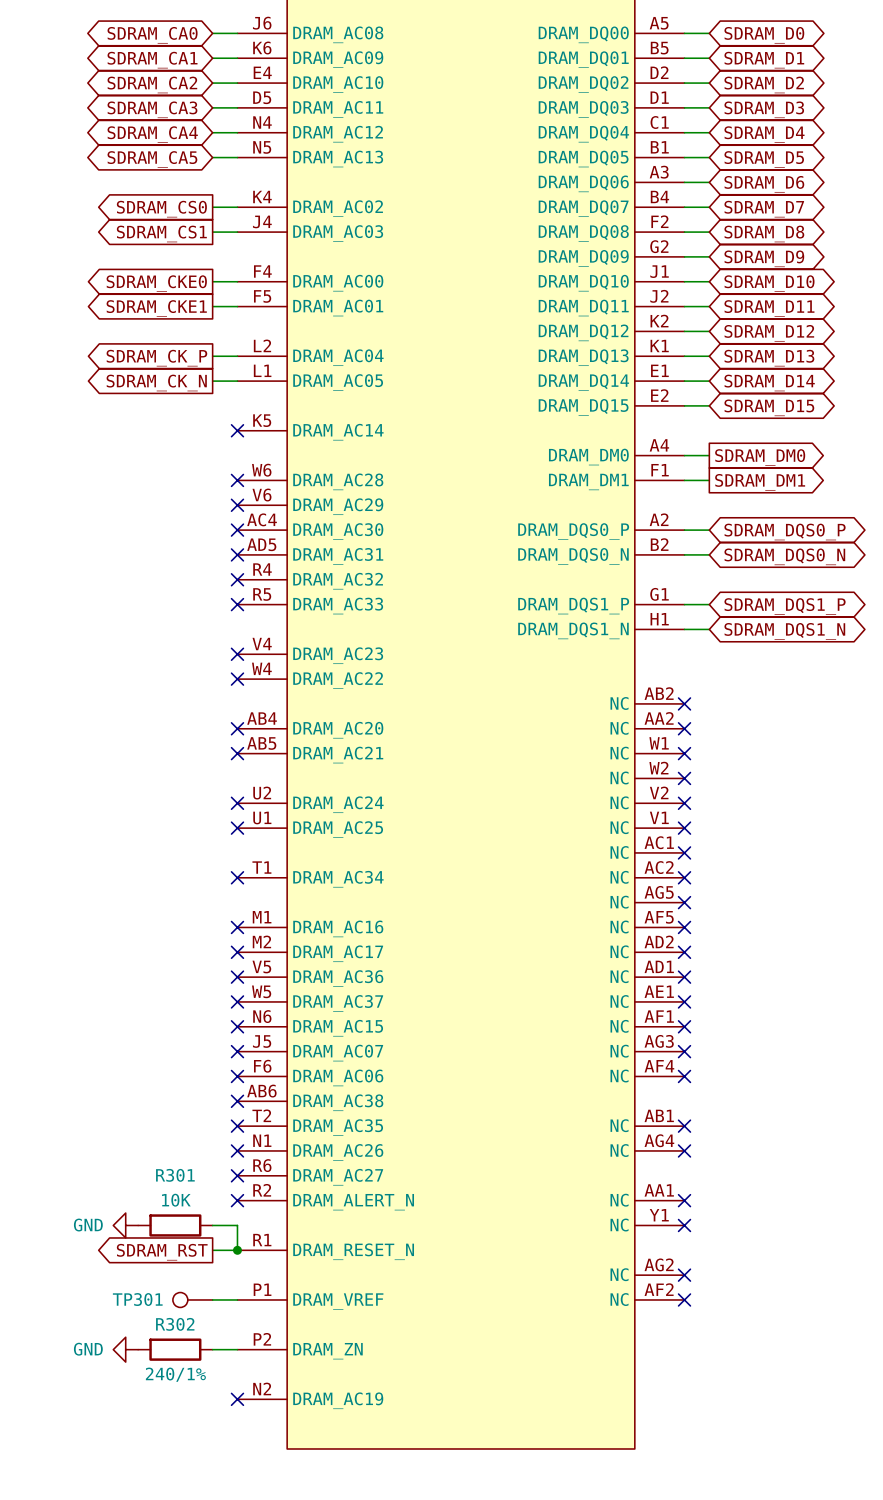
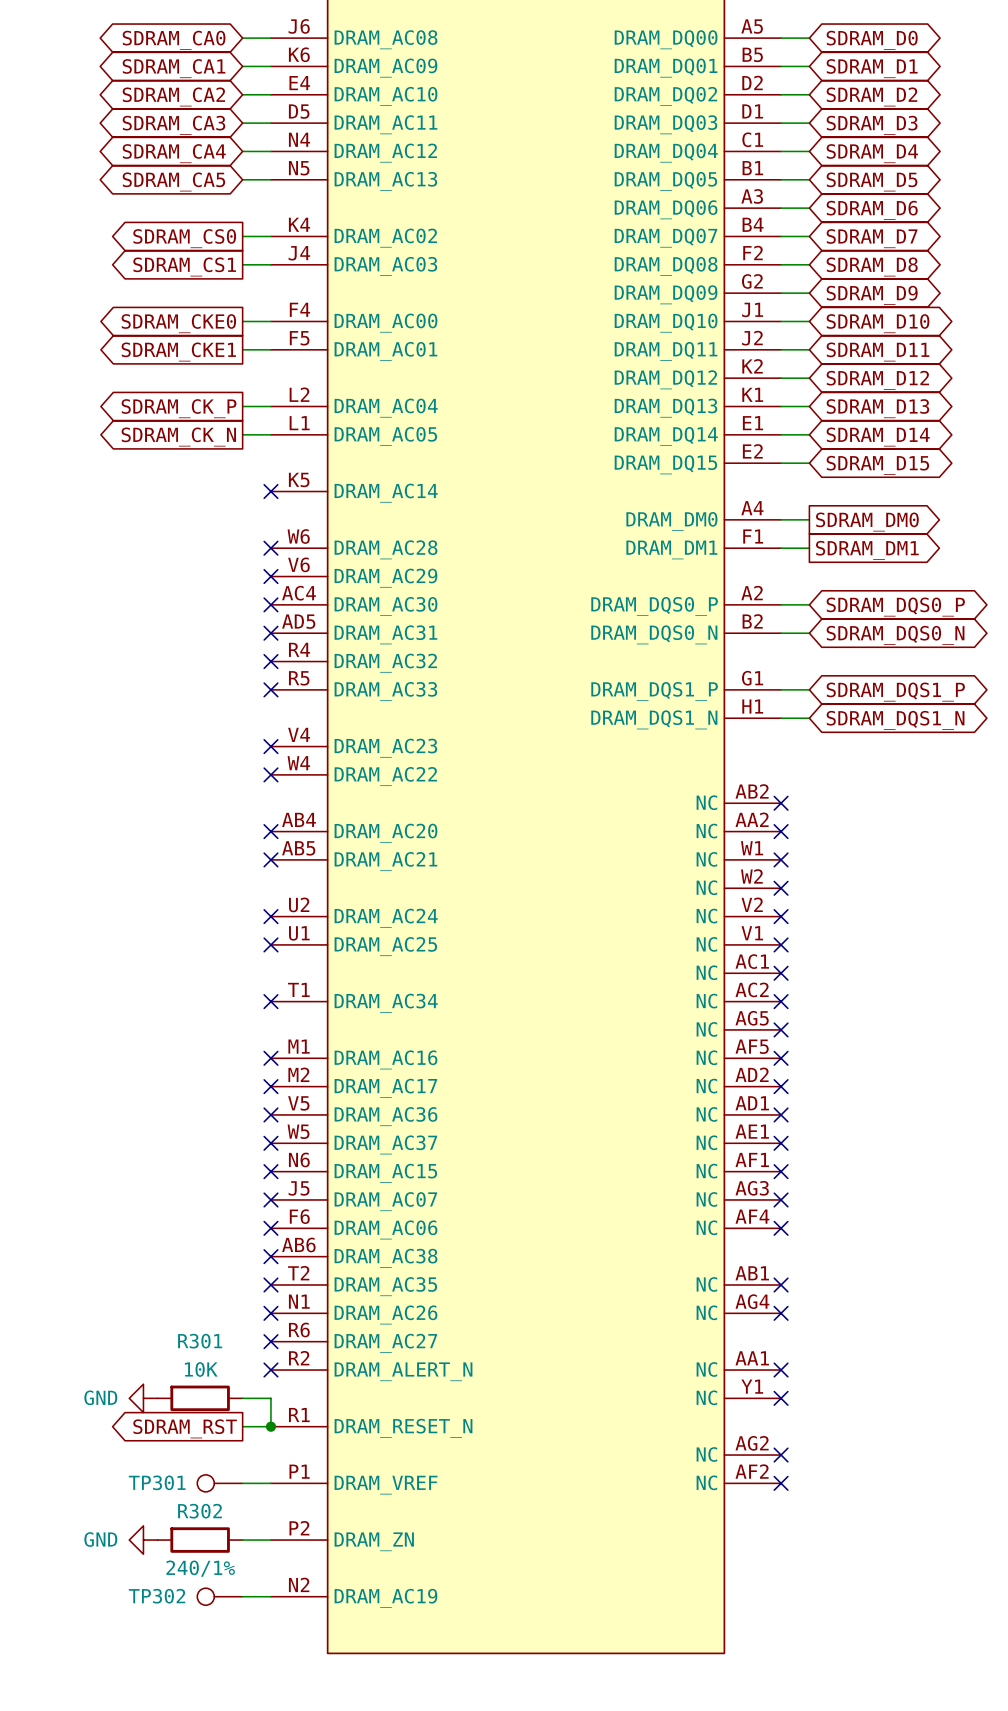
TP302: none -> (219, 1596)
wire: none -> (242, 1596) (270, 1596)
no-connect mark: (237, 1399) -> none

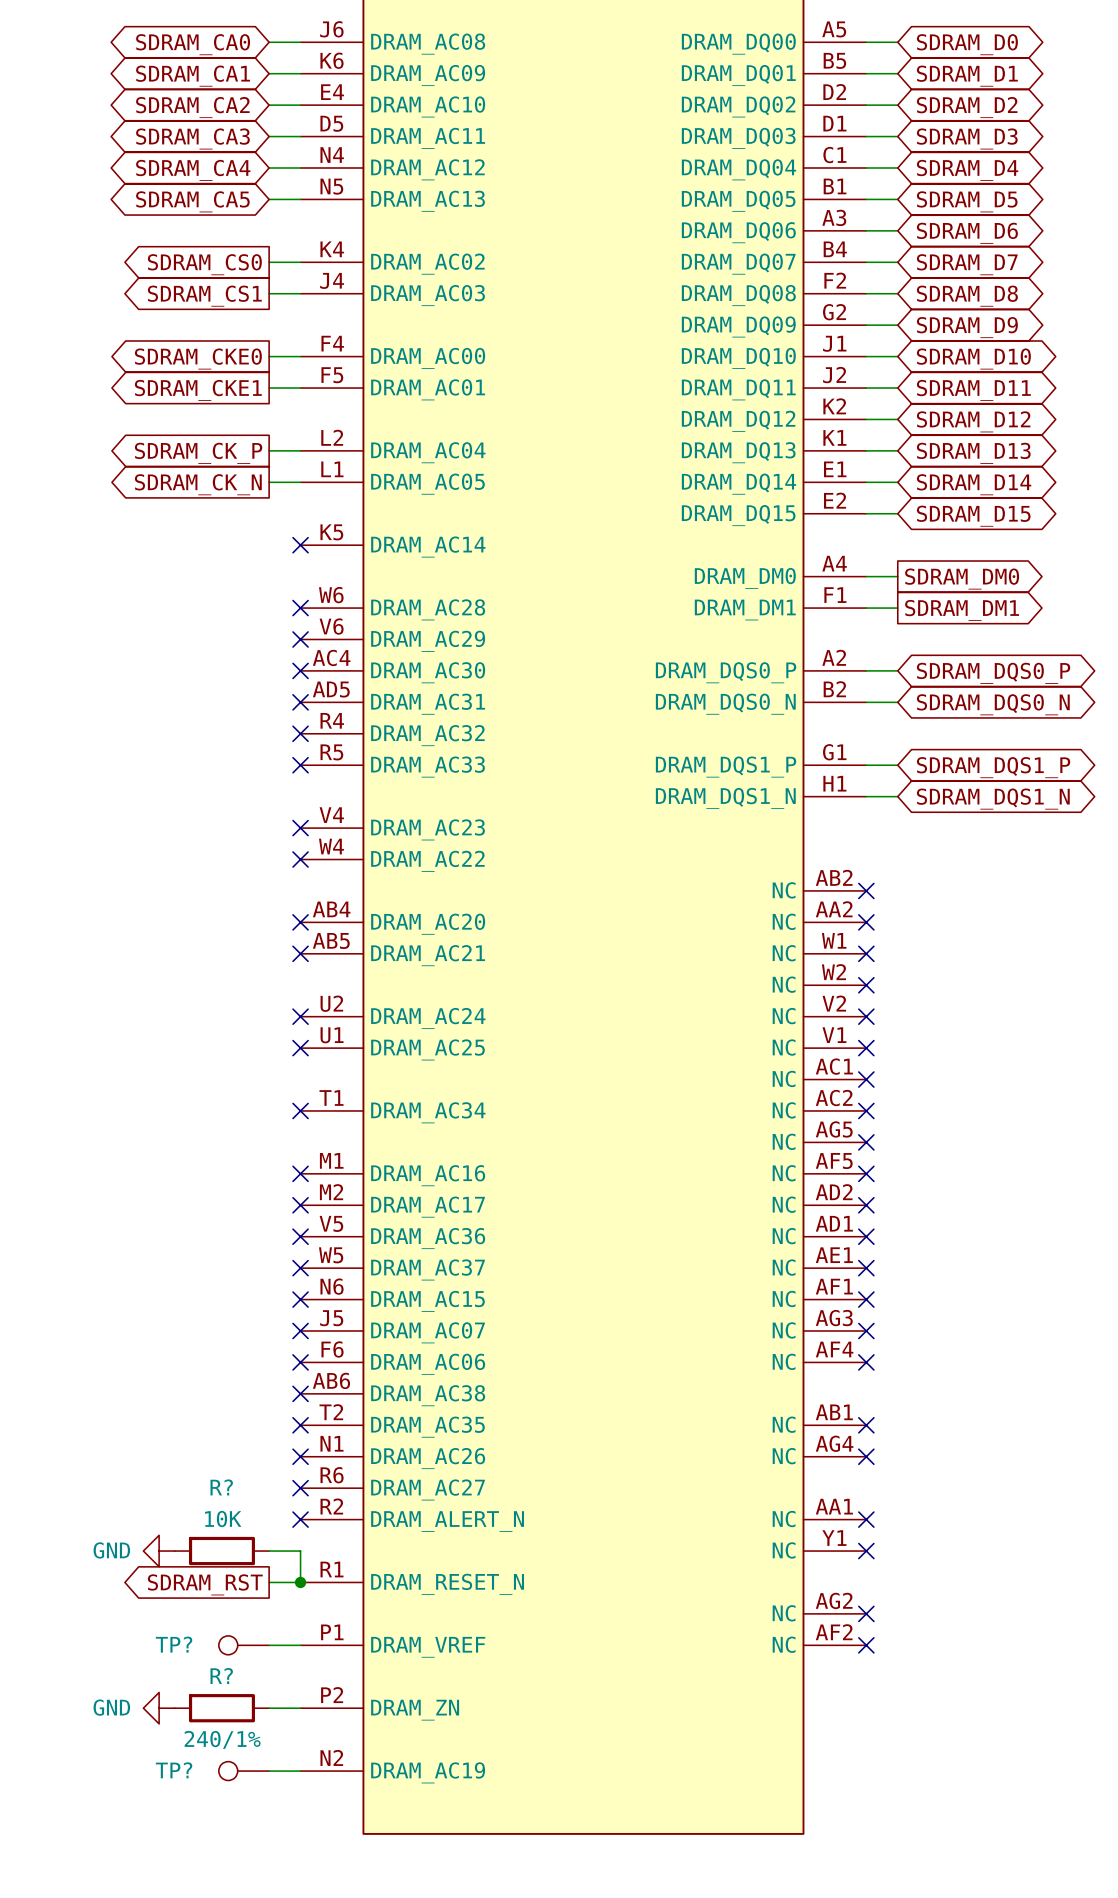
R301 name: R301 (200, 1341) -> R? (221, 1487)
TP301 name: TP301 (157, 1482) -> TP? (174, 1644)
R302 name: R302 (199, 1511) -> R? (221, 1676)
TP302 name: TP302 (157, 1596) -> TP? (174, 1770)

